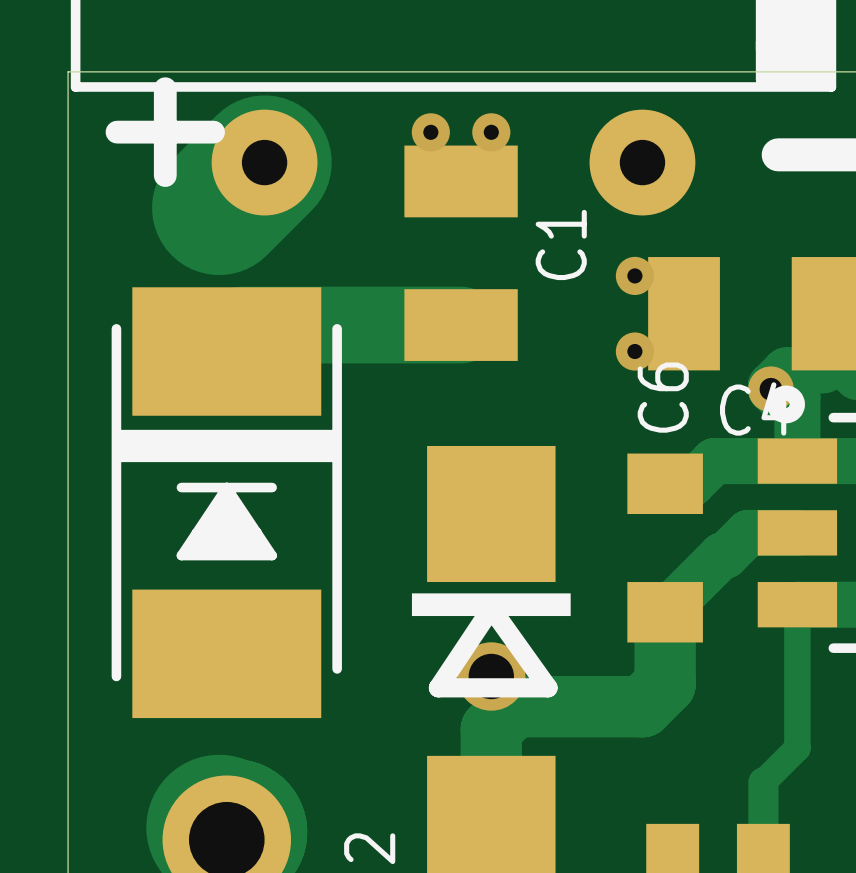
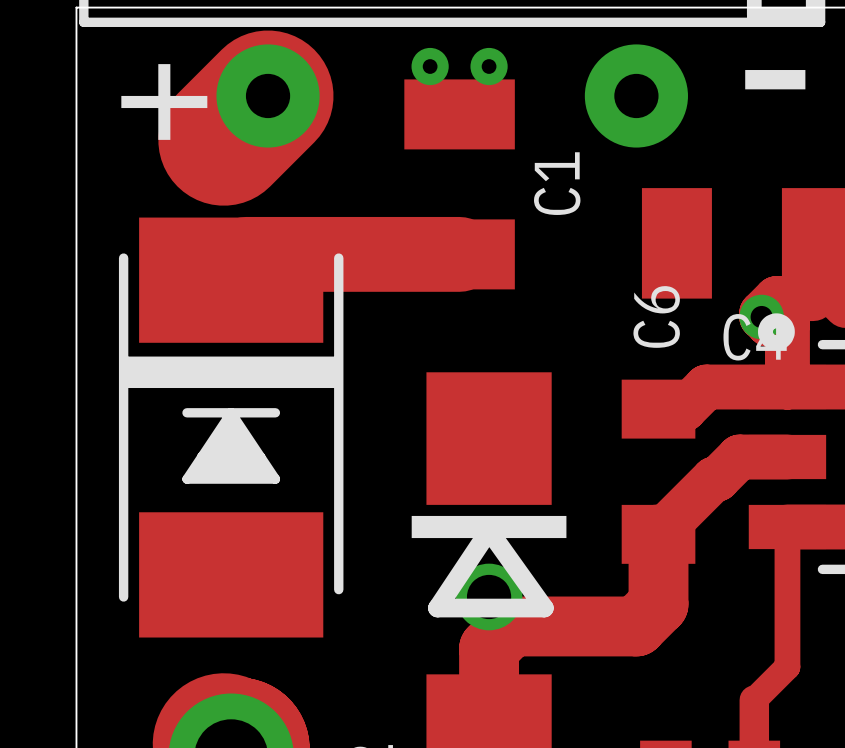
via: (634, 275) -> none
via: (634, 351) -> none

